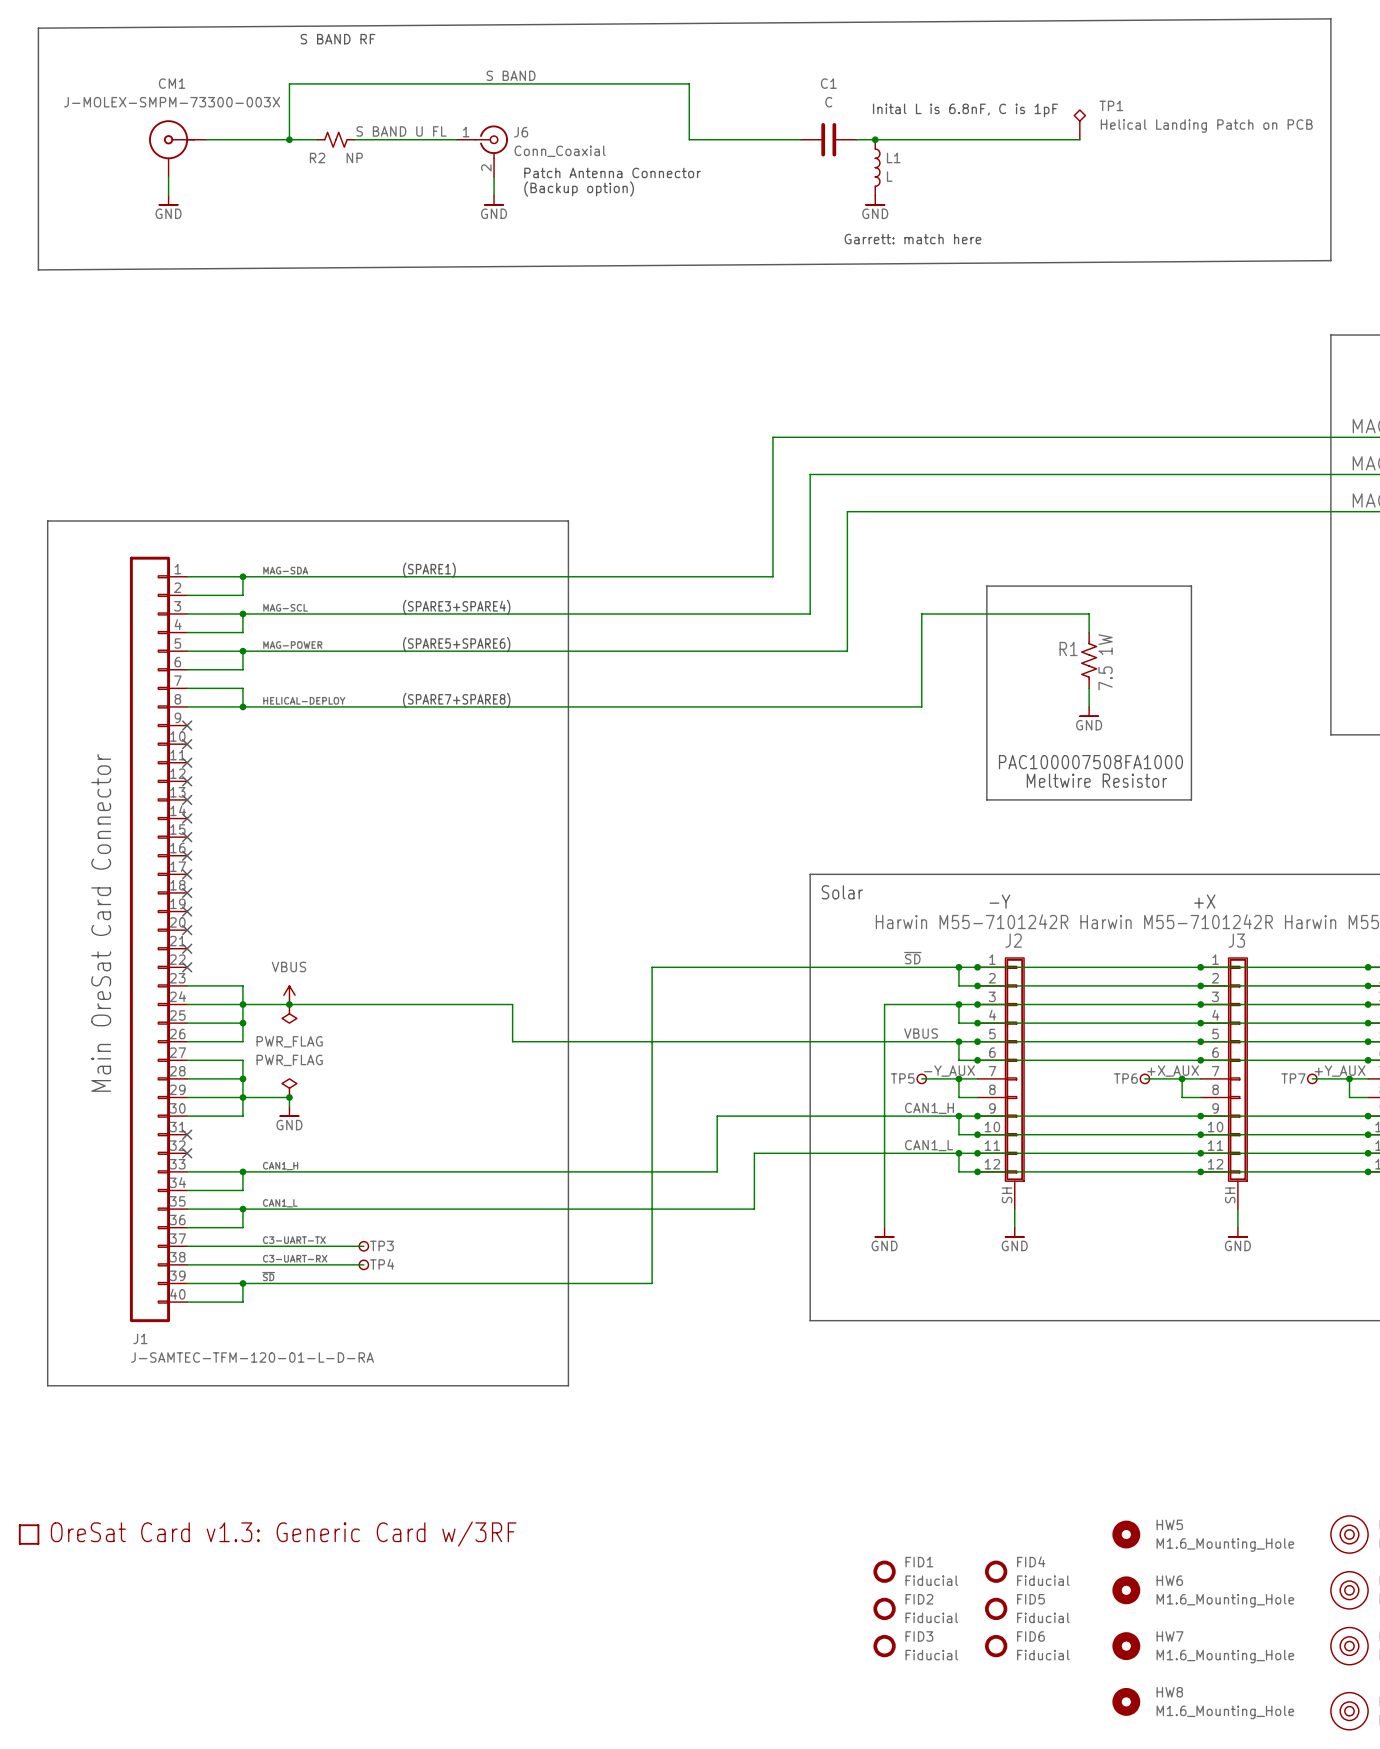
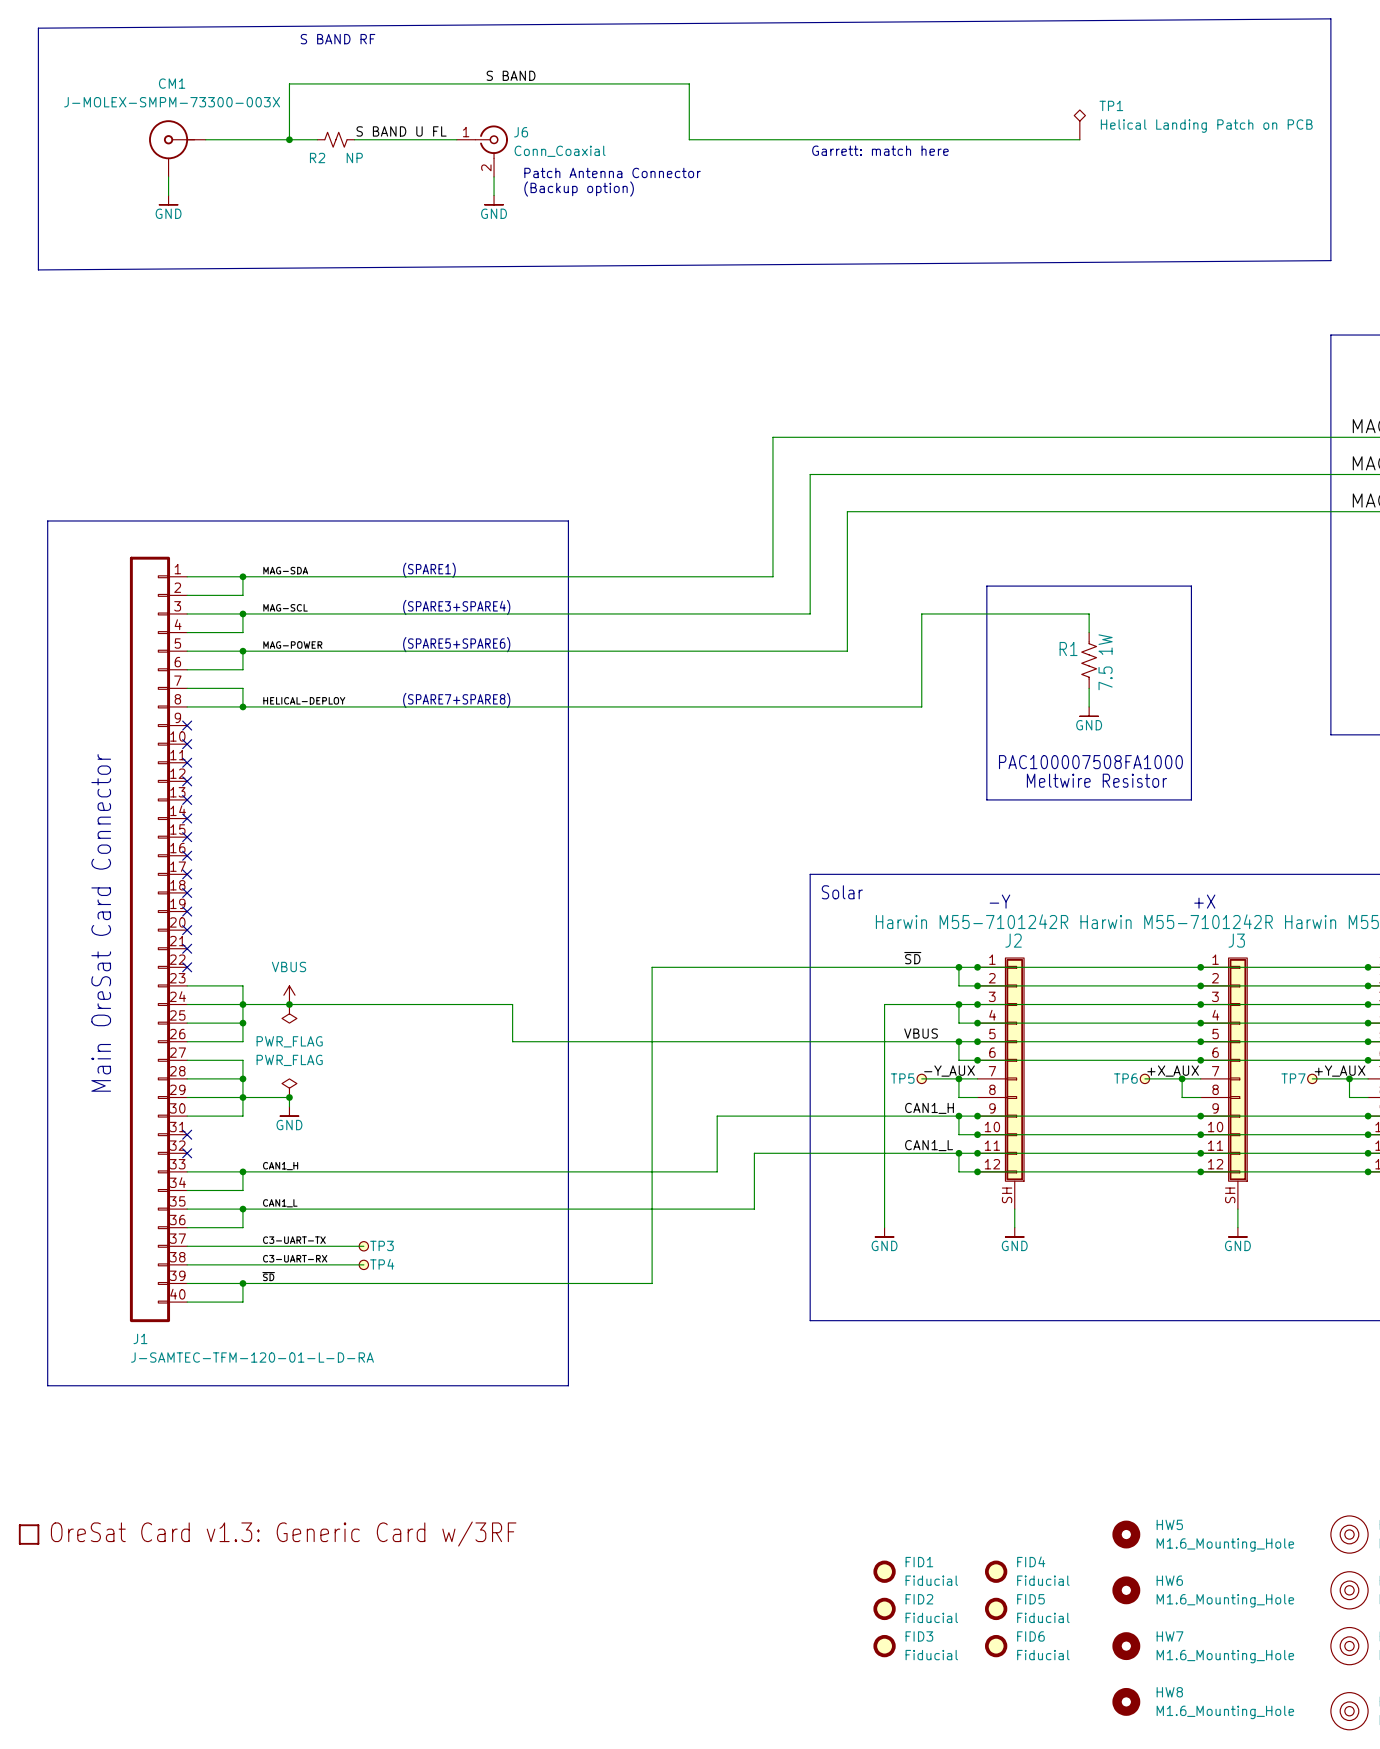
text: Inital L is 6.8nF, C is 1pF (965, 110) -> none
C1: C (828, 139) -> none
junction: (875, 139) -> none
L1: L (877, 167) -> none
power symbol: GND (875, 200) -> none
text position: Garrett: match here (912, 239) -> Garrett: match here (880, 150)

